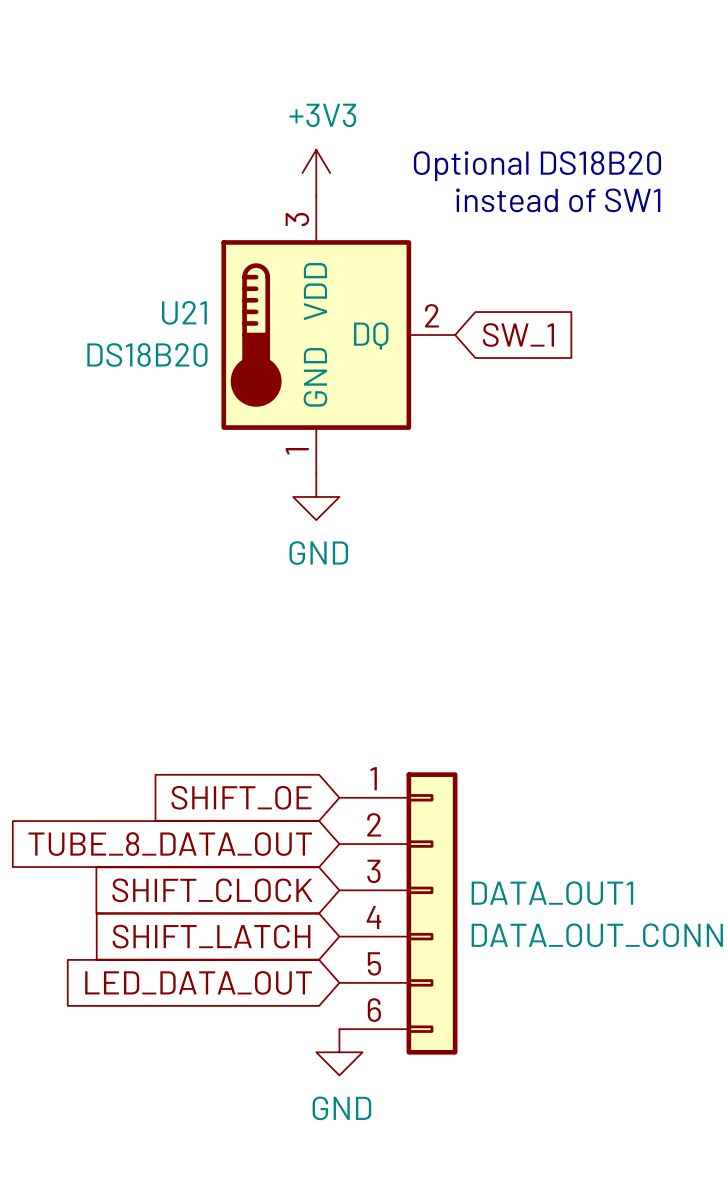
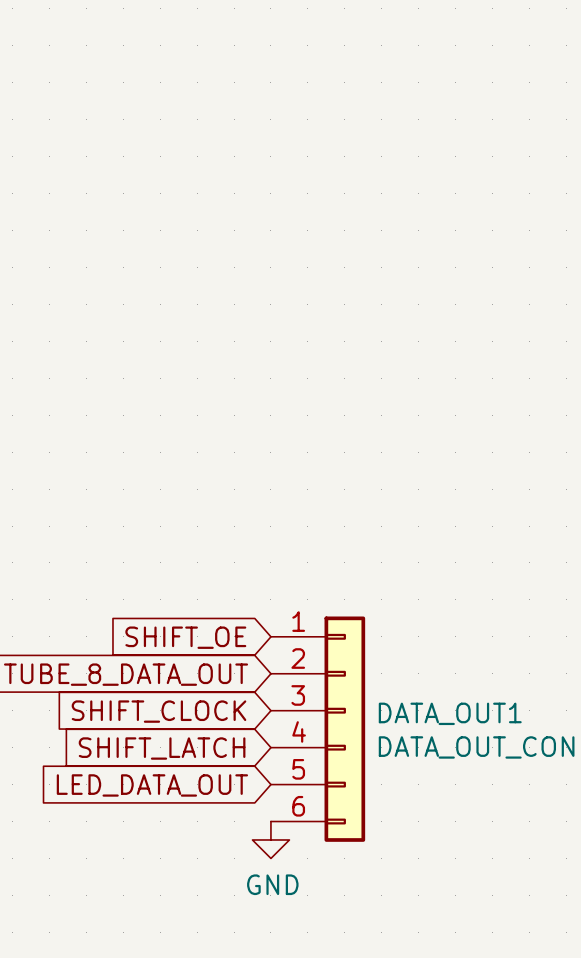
text: Optional DS18B20 (537, 166) -> none
power symbol: +3V3 (316, 173) -> none
text: instead of SW1 (558, 200) -> none
U21: DS18B20 (338, 335) -> none
global label: SW_1 (518, 335) -> none
power symbol: GND (316, 496) -> none

